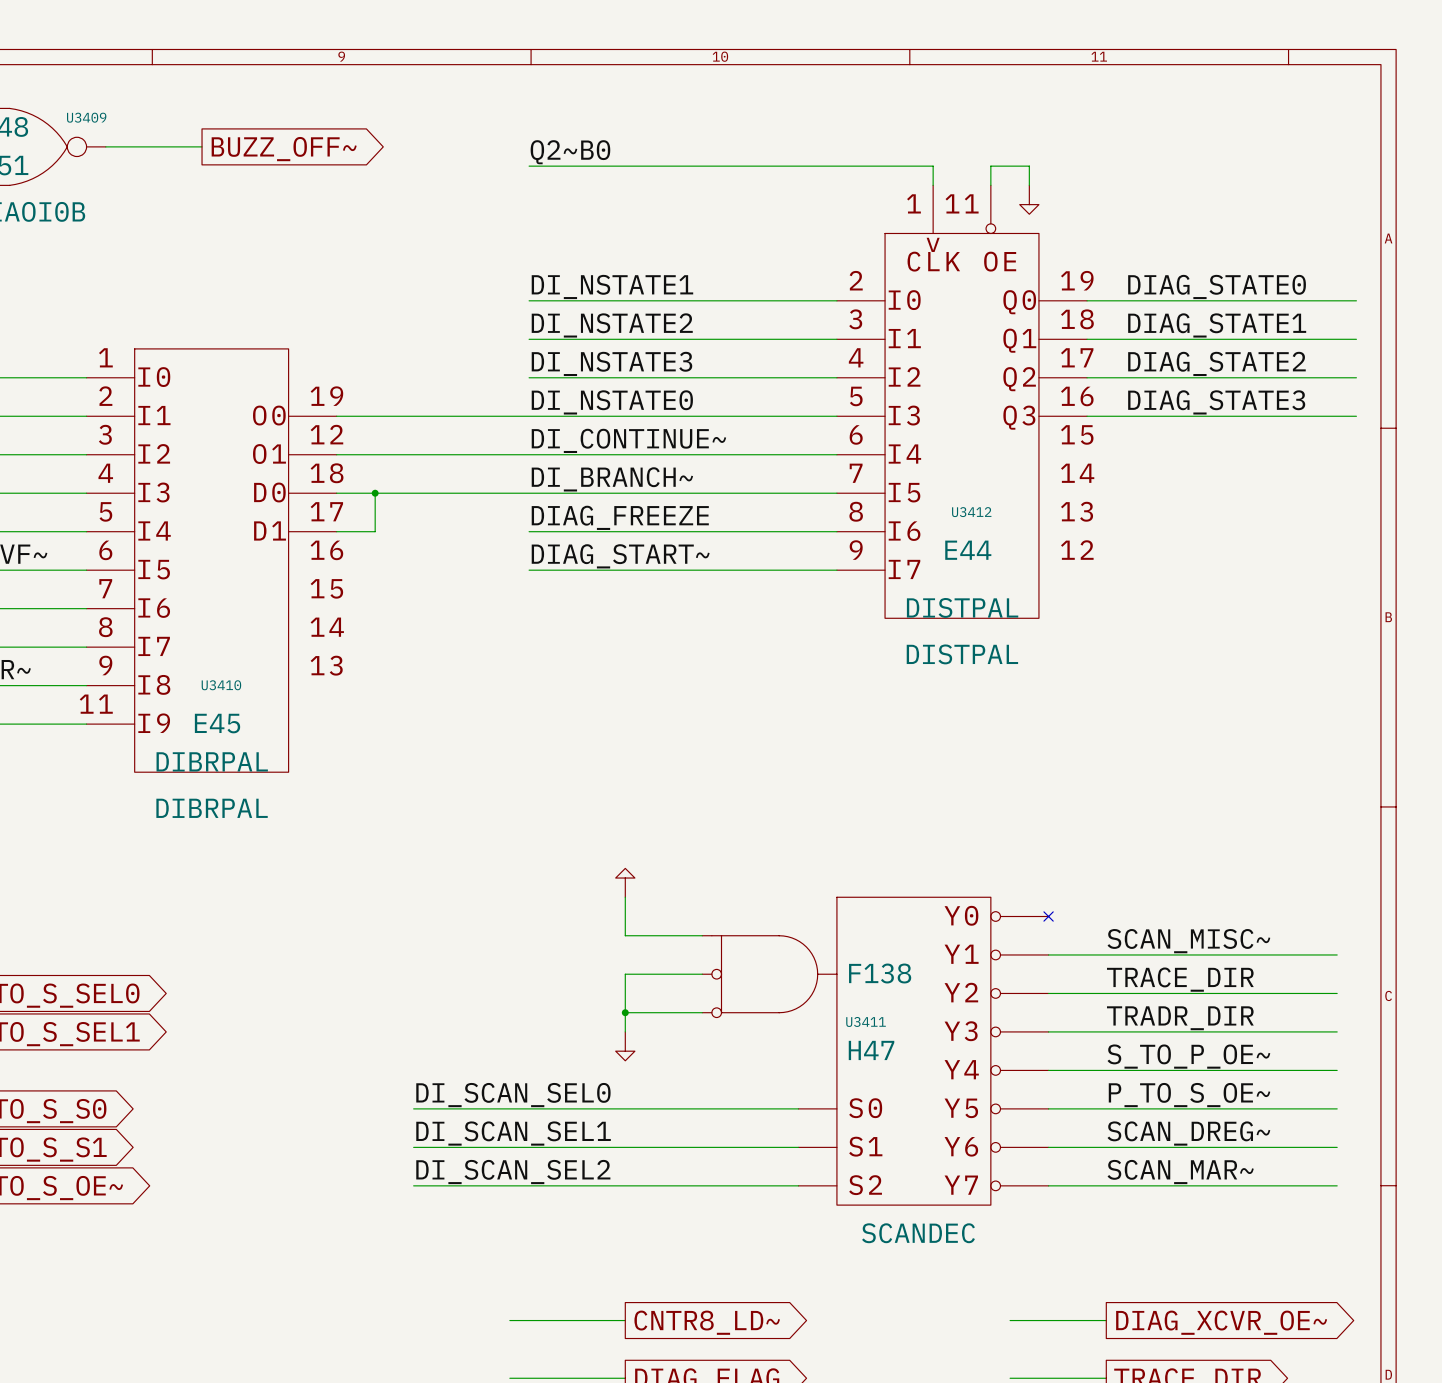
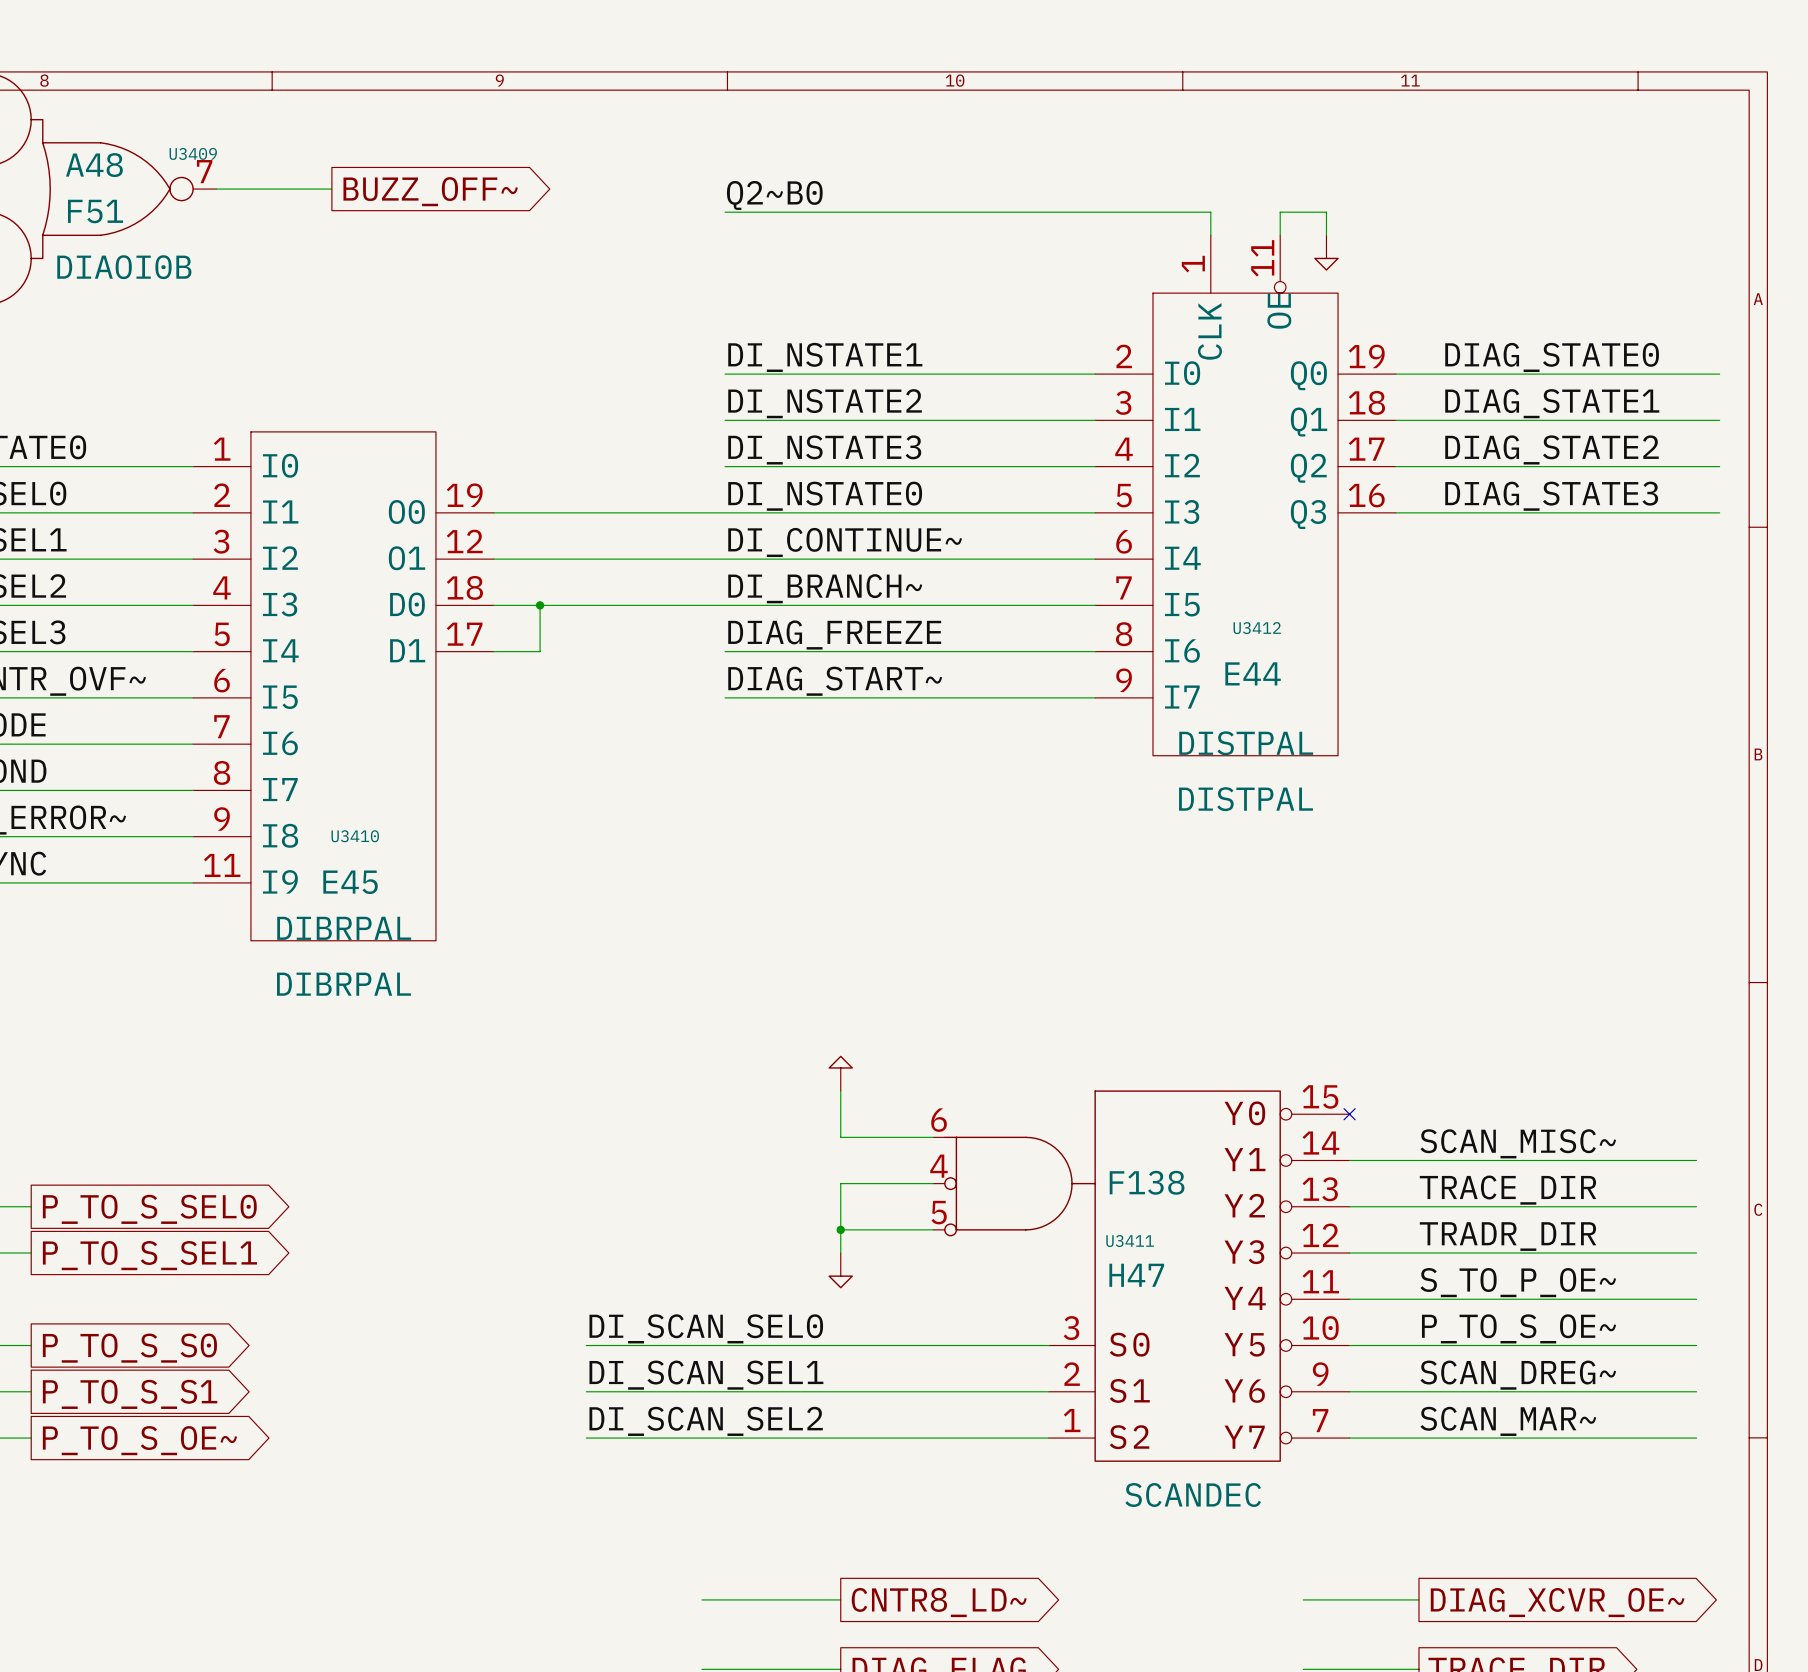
U3409 pin number: none -> 7 (204, 171)
U3412 symbol: [836, 185, 1088, 619] -> [1095, 235, 1396, 756]
U3410 symbol: [86, 348, 337, 773] -> [193, 431, 494, 941]
U3411 symbol: [702, 896, 1049, 1206] -> [933, 1090, 1350, 1462]

